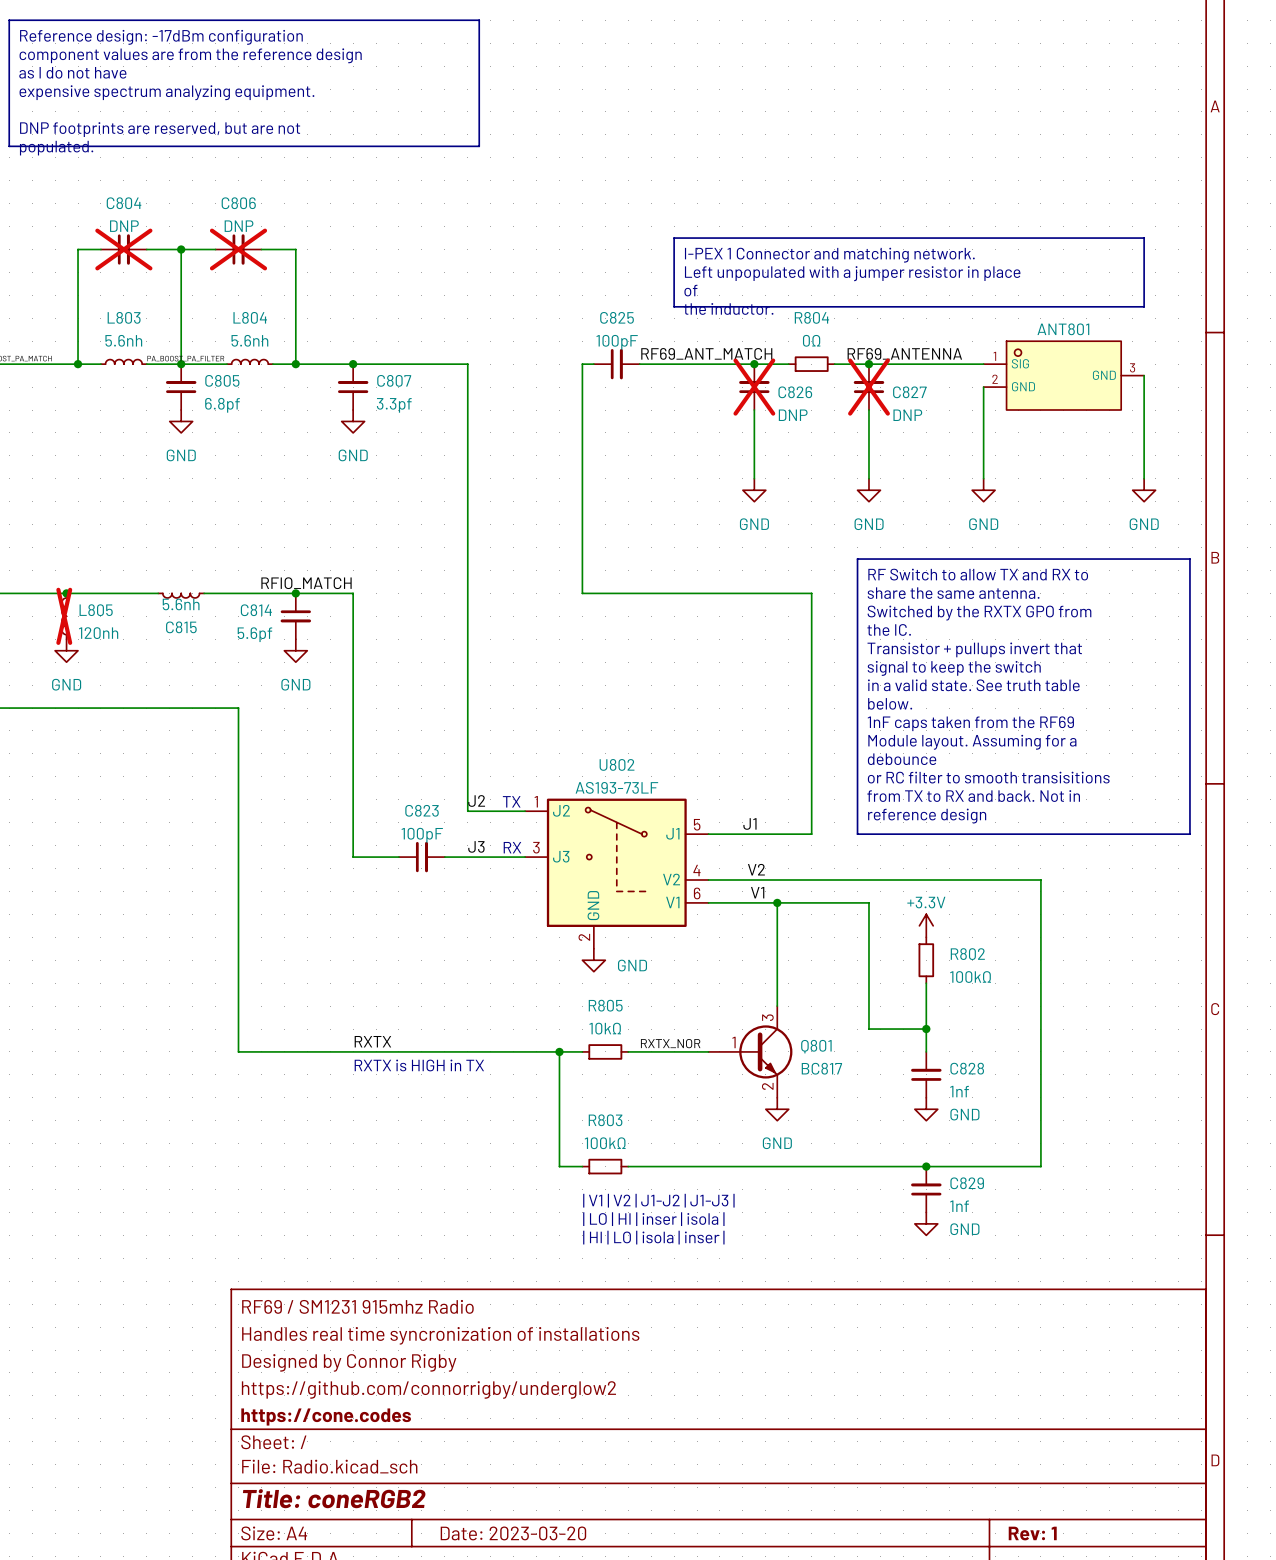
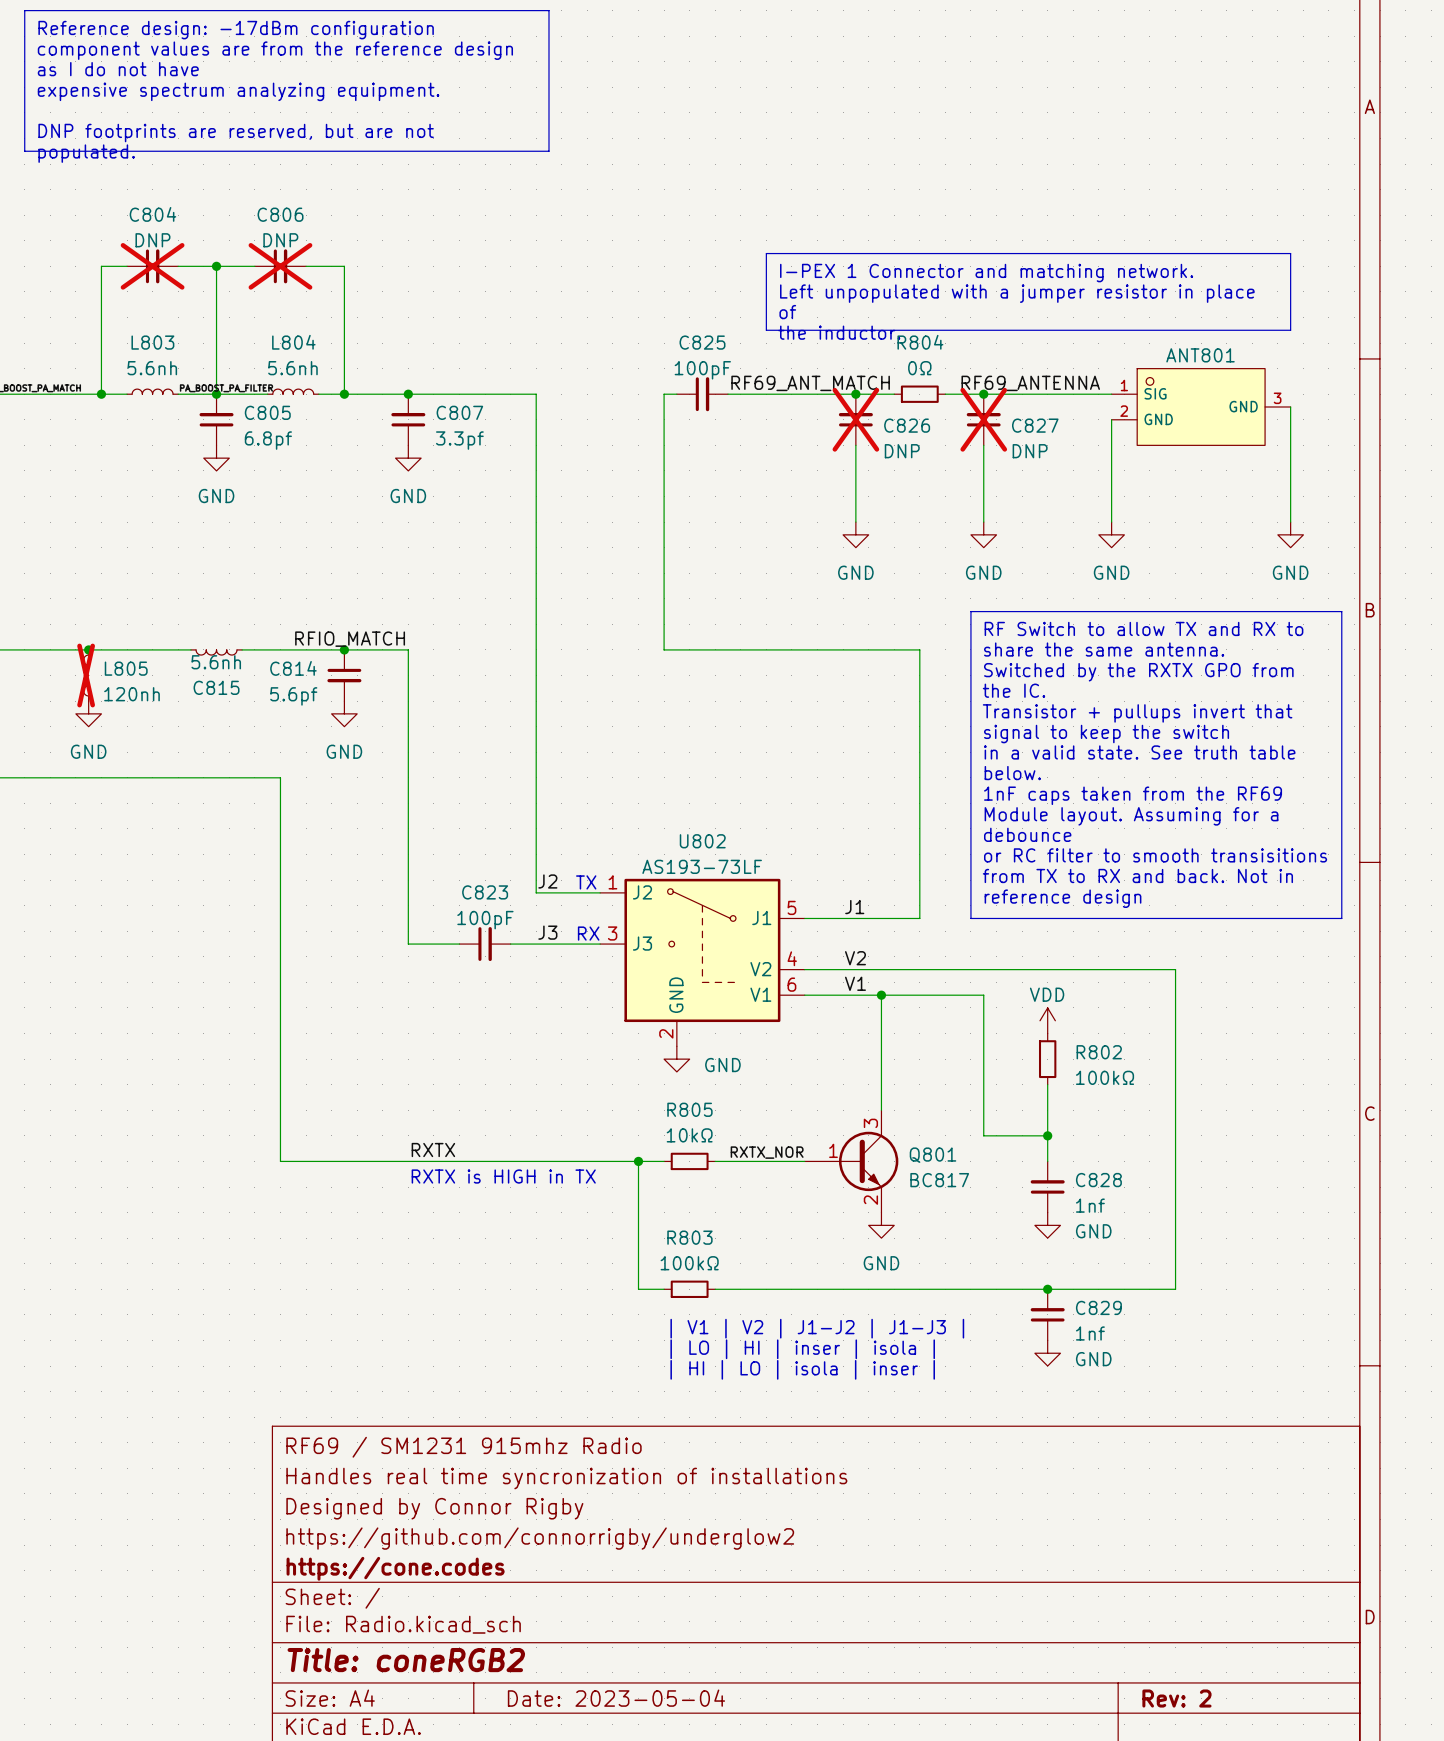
power symbol: +3.3V (926, 925) -> VDD (1047, 1020)
title block: Date: 2023-03-20 (513, 1533) -> Date: 2023-05-04 (616, 1698)
title block: Rev: 1 (1032, 1533) -> Rev: 2 (1176, 1698)

